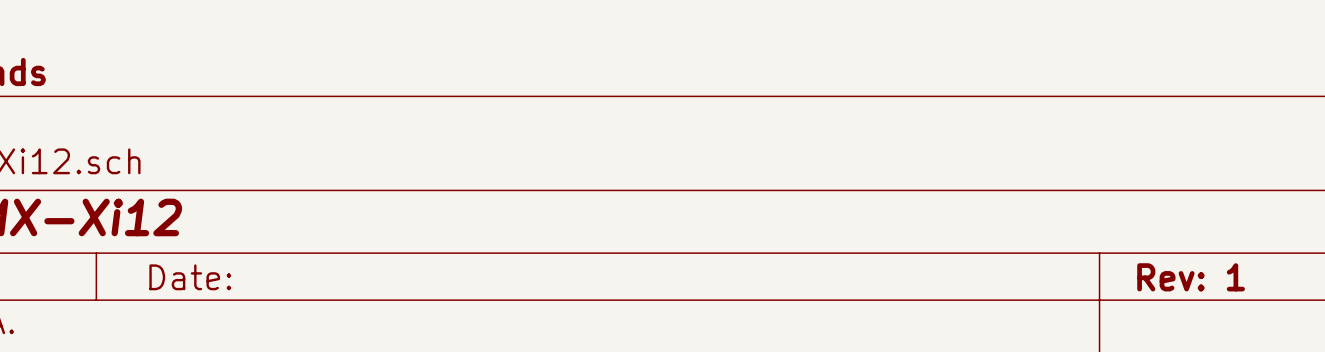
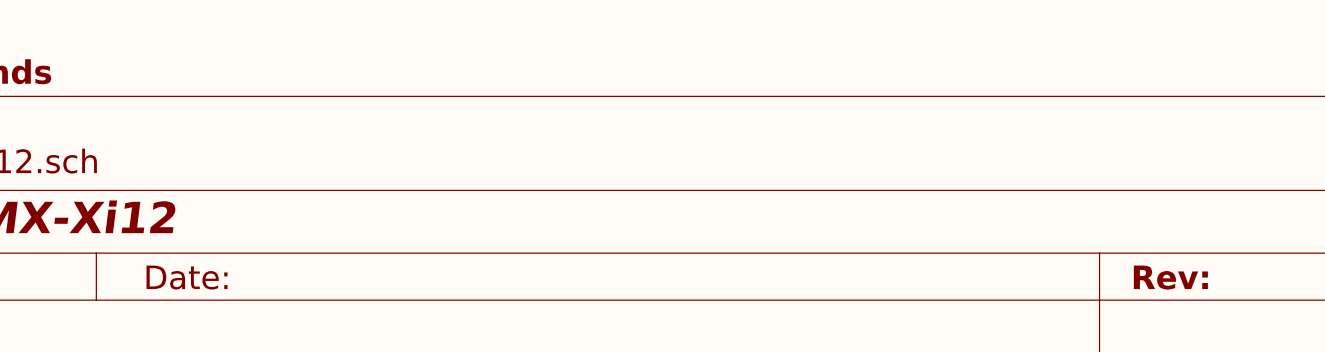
title block: Rev: 1 (1191, 277) -> Rev: (1170, 277)

